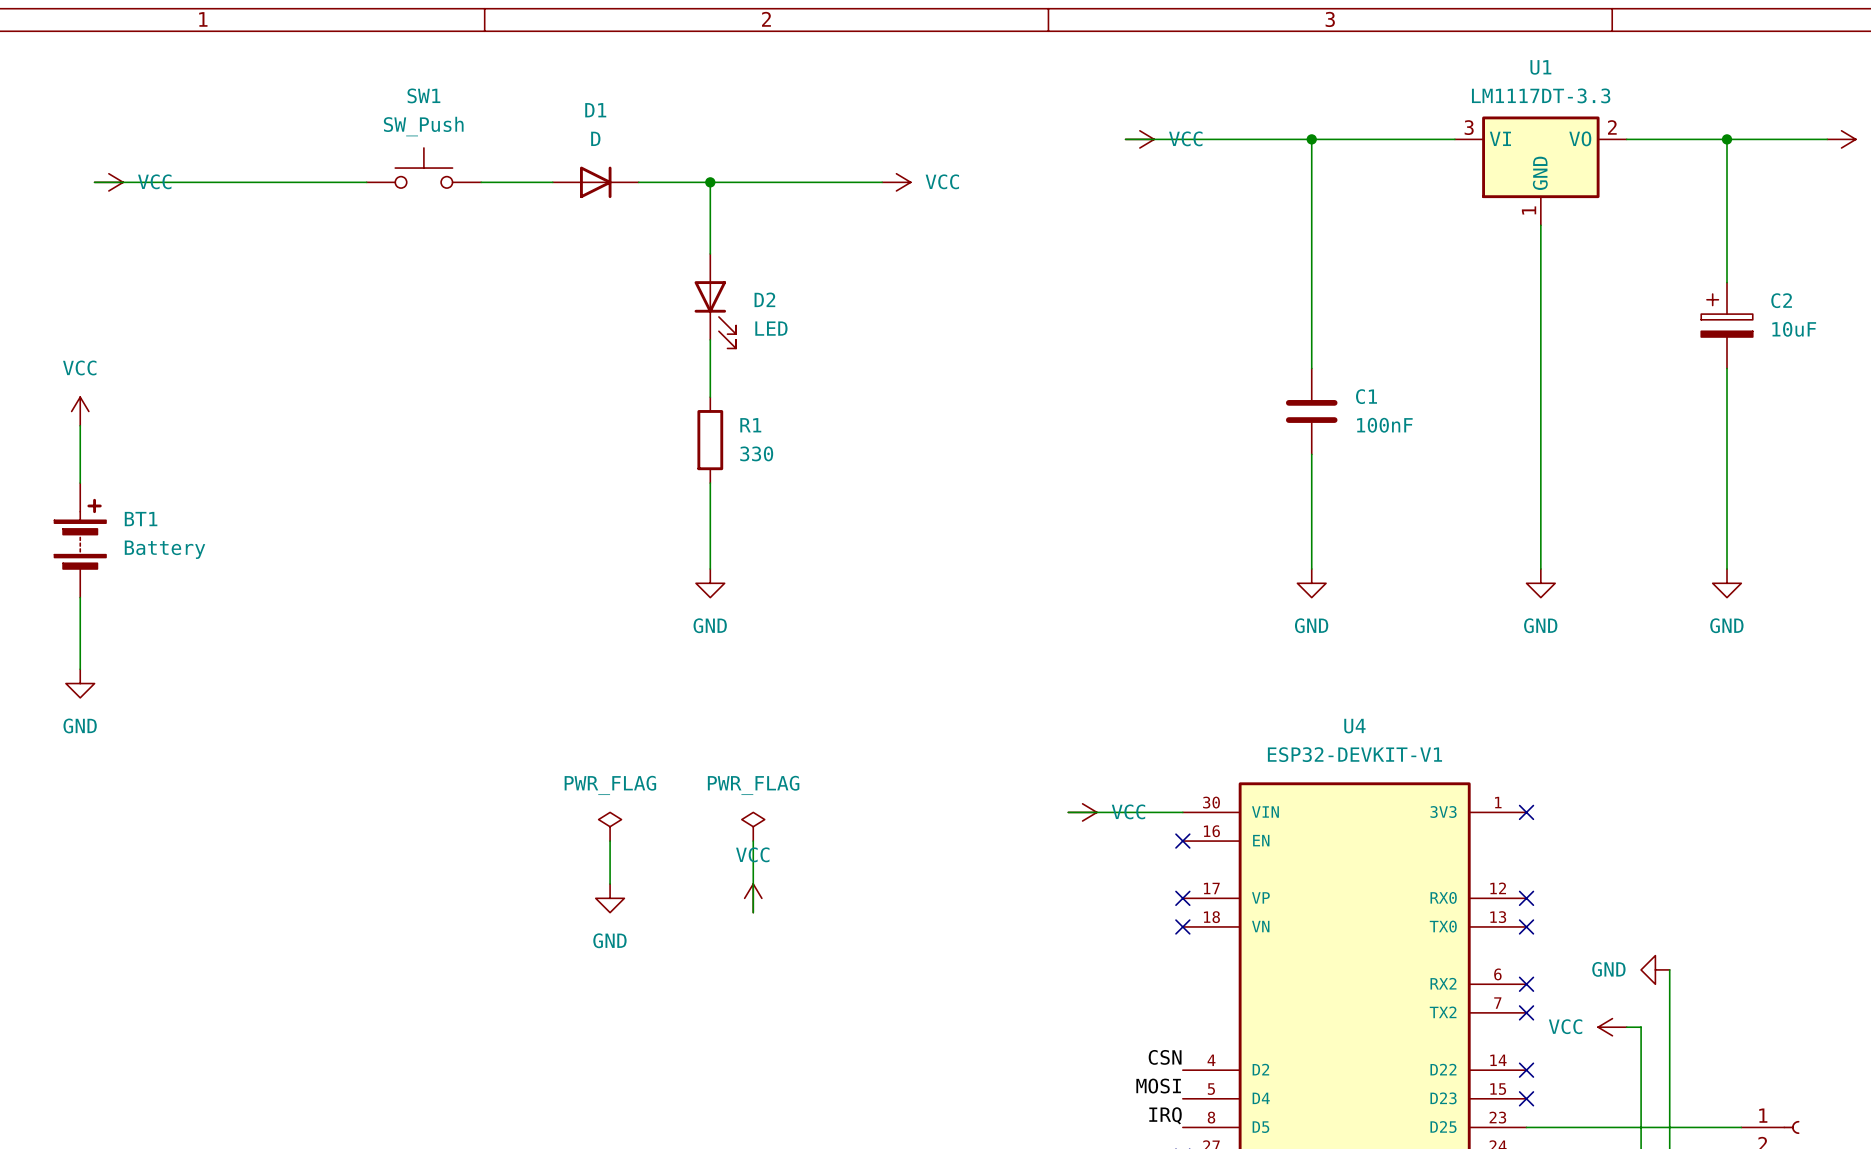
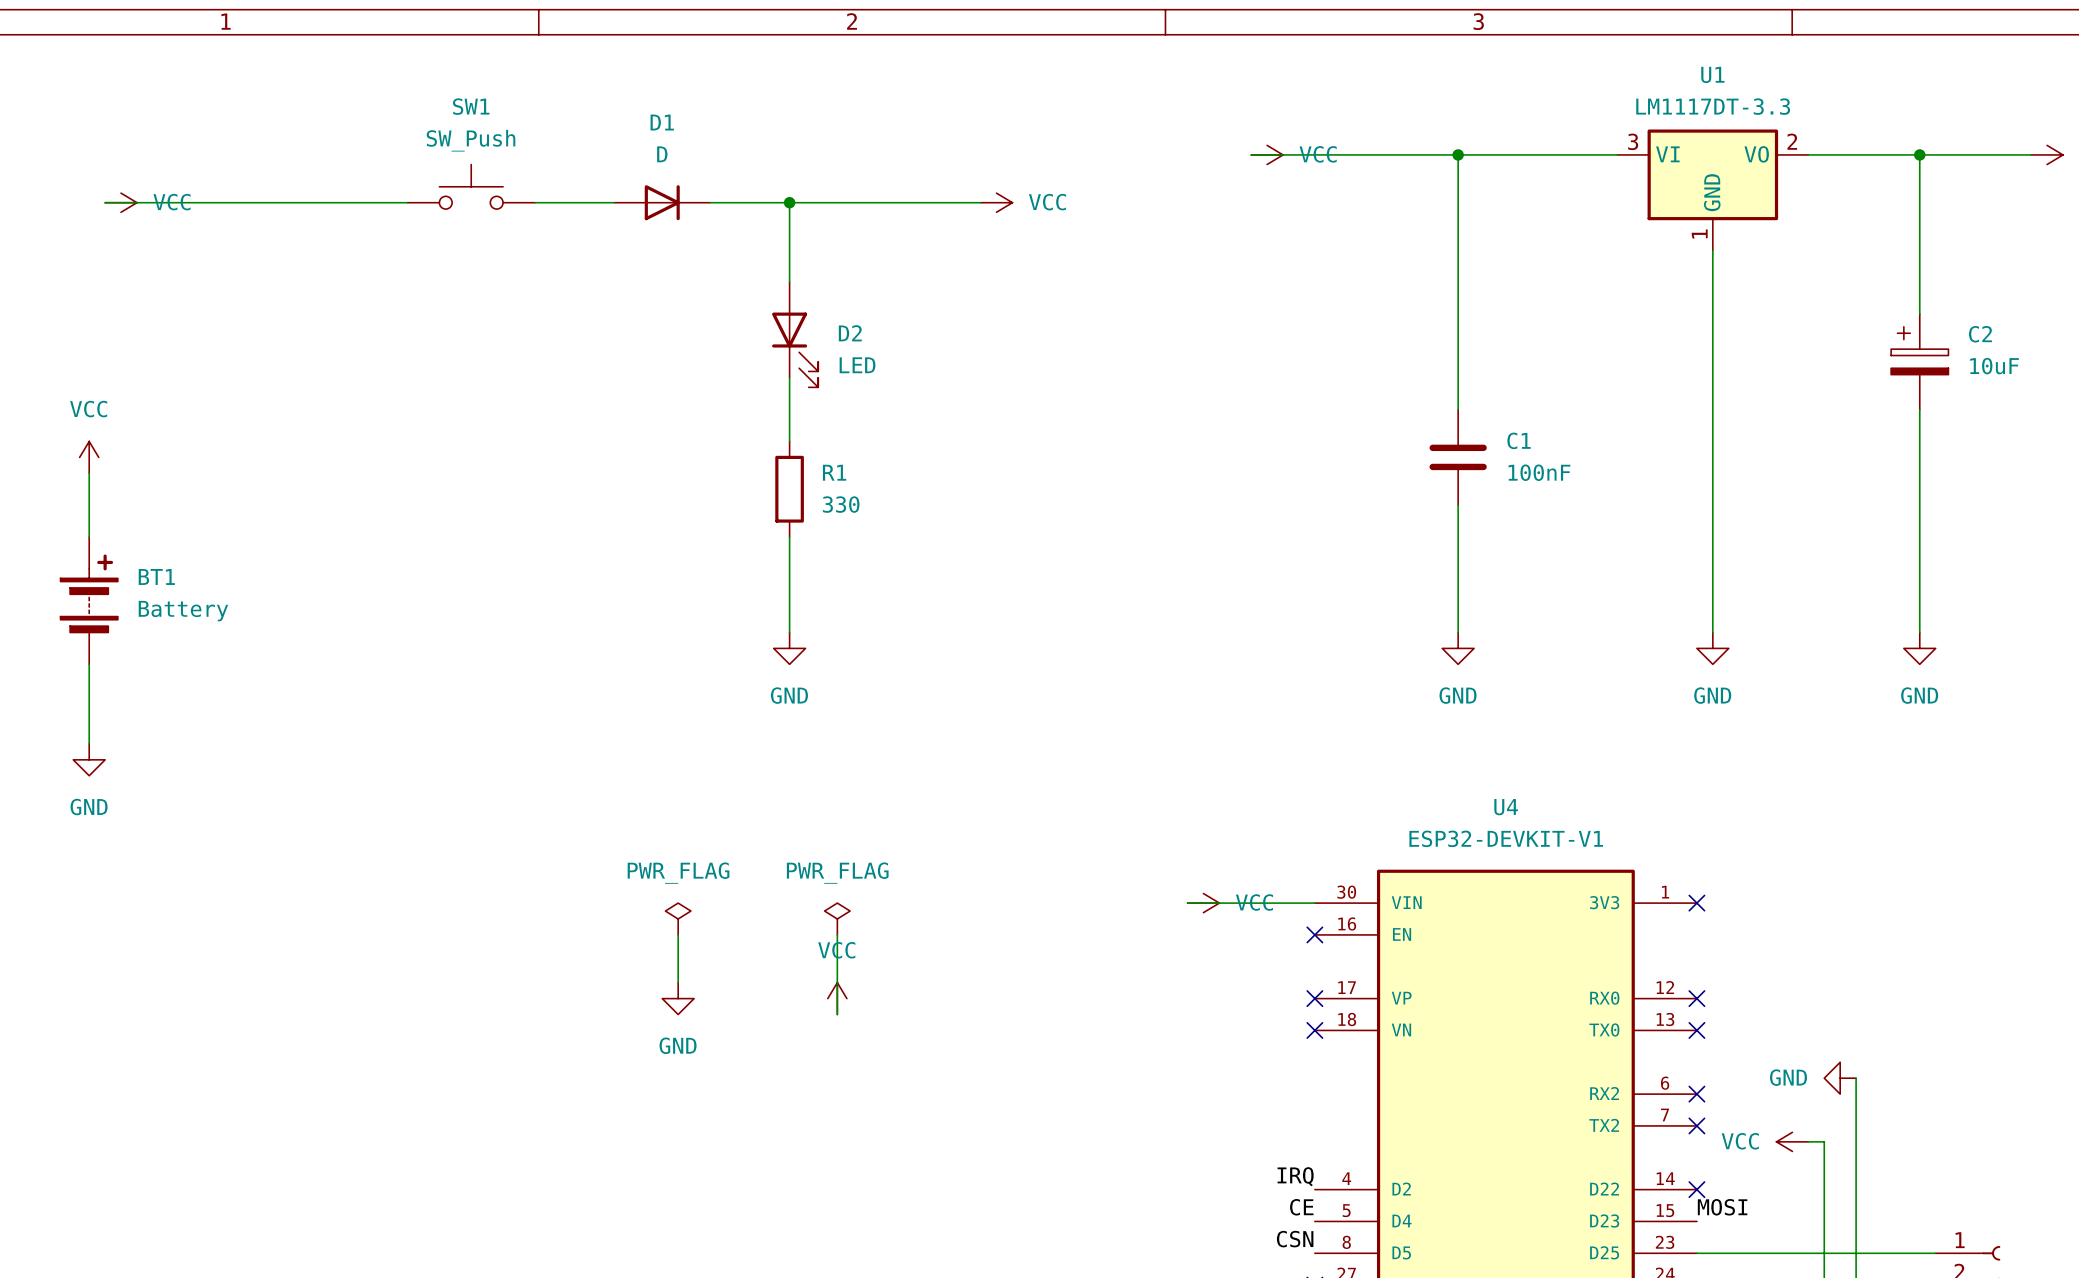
label: CSN (1165, 1057) -> IRQ (1295, 1176)
label: MOSI (1158, 1086) -> CE (1301, 1207)
label: none -> MOSI (1722, 1207)
no-connect mark: (1526, 1098) -> none
label: IRQ (1165, 1115) -> CSN (1295, 1239)

